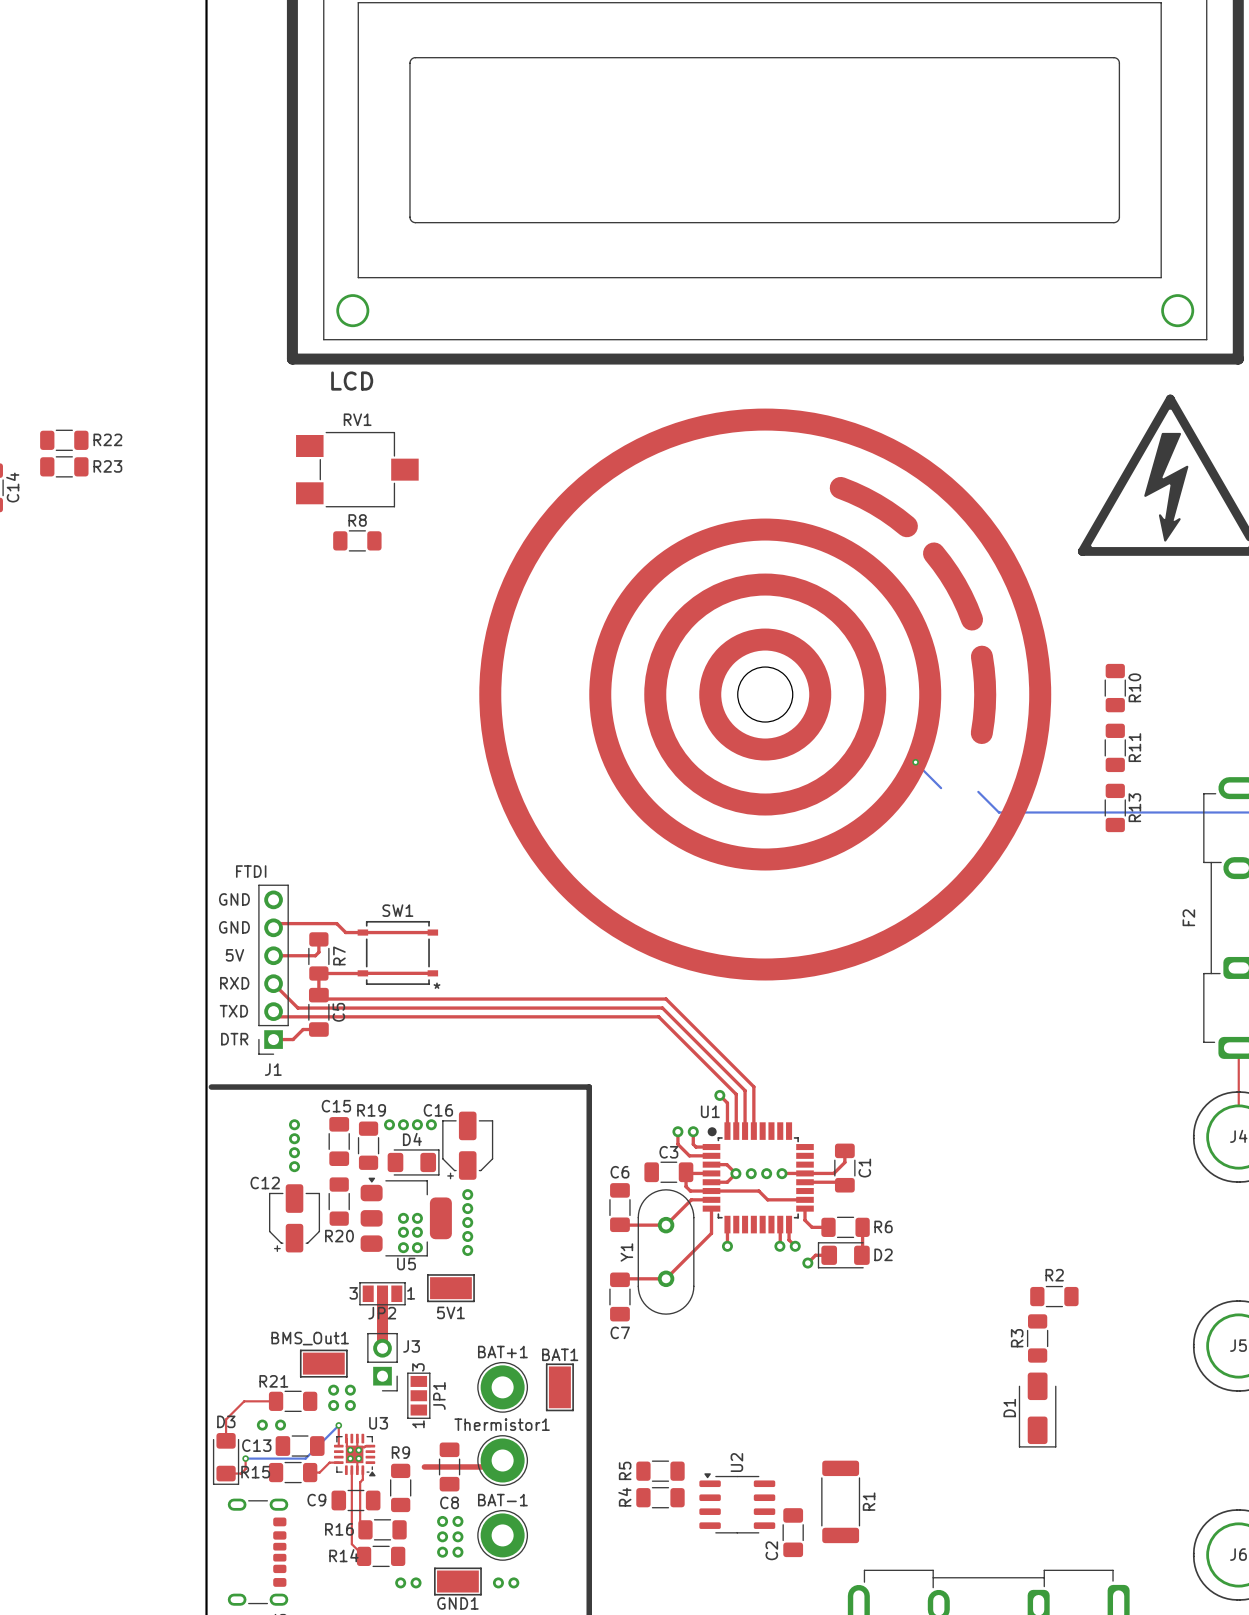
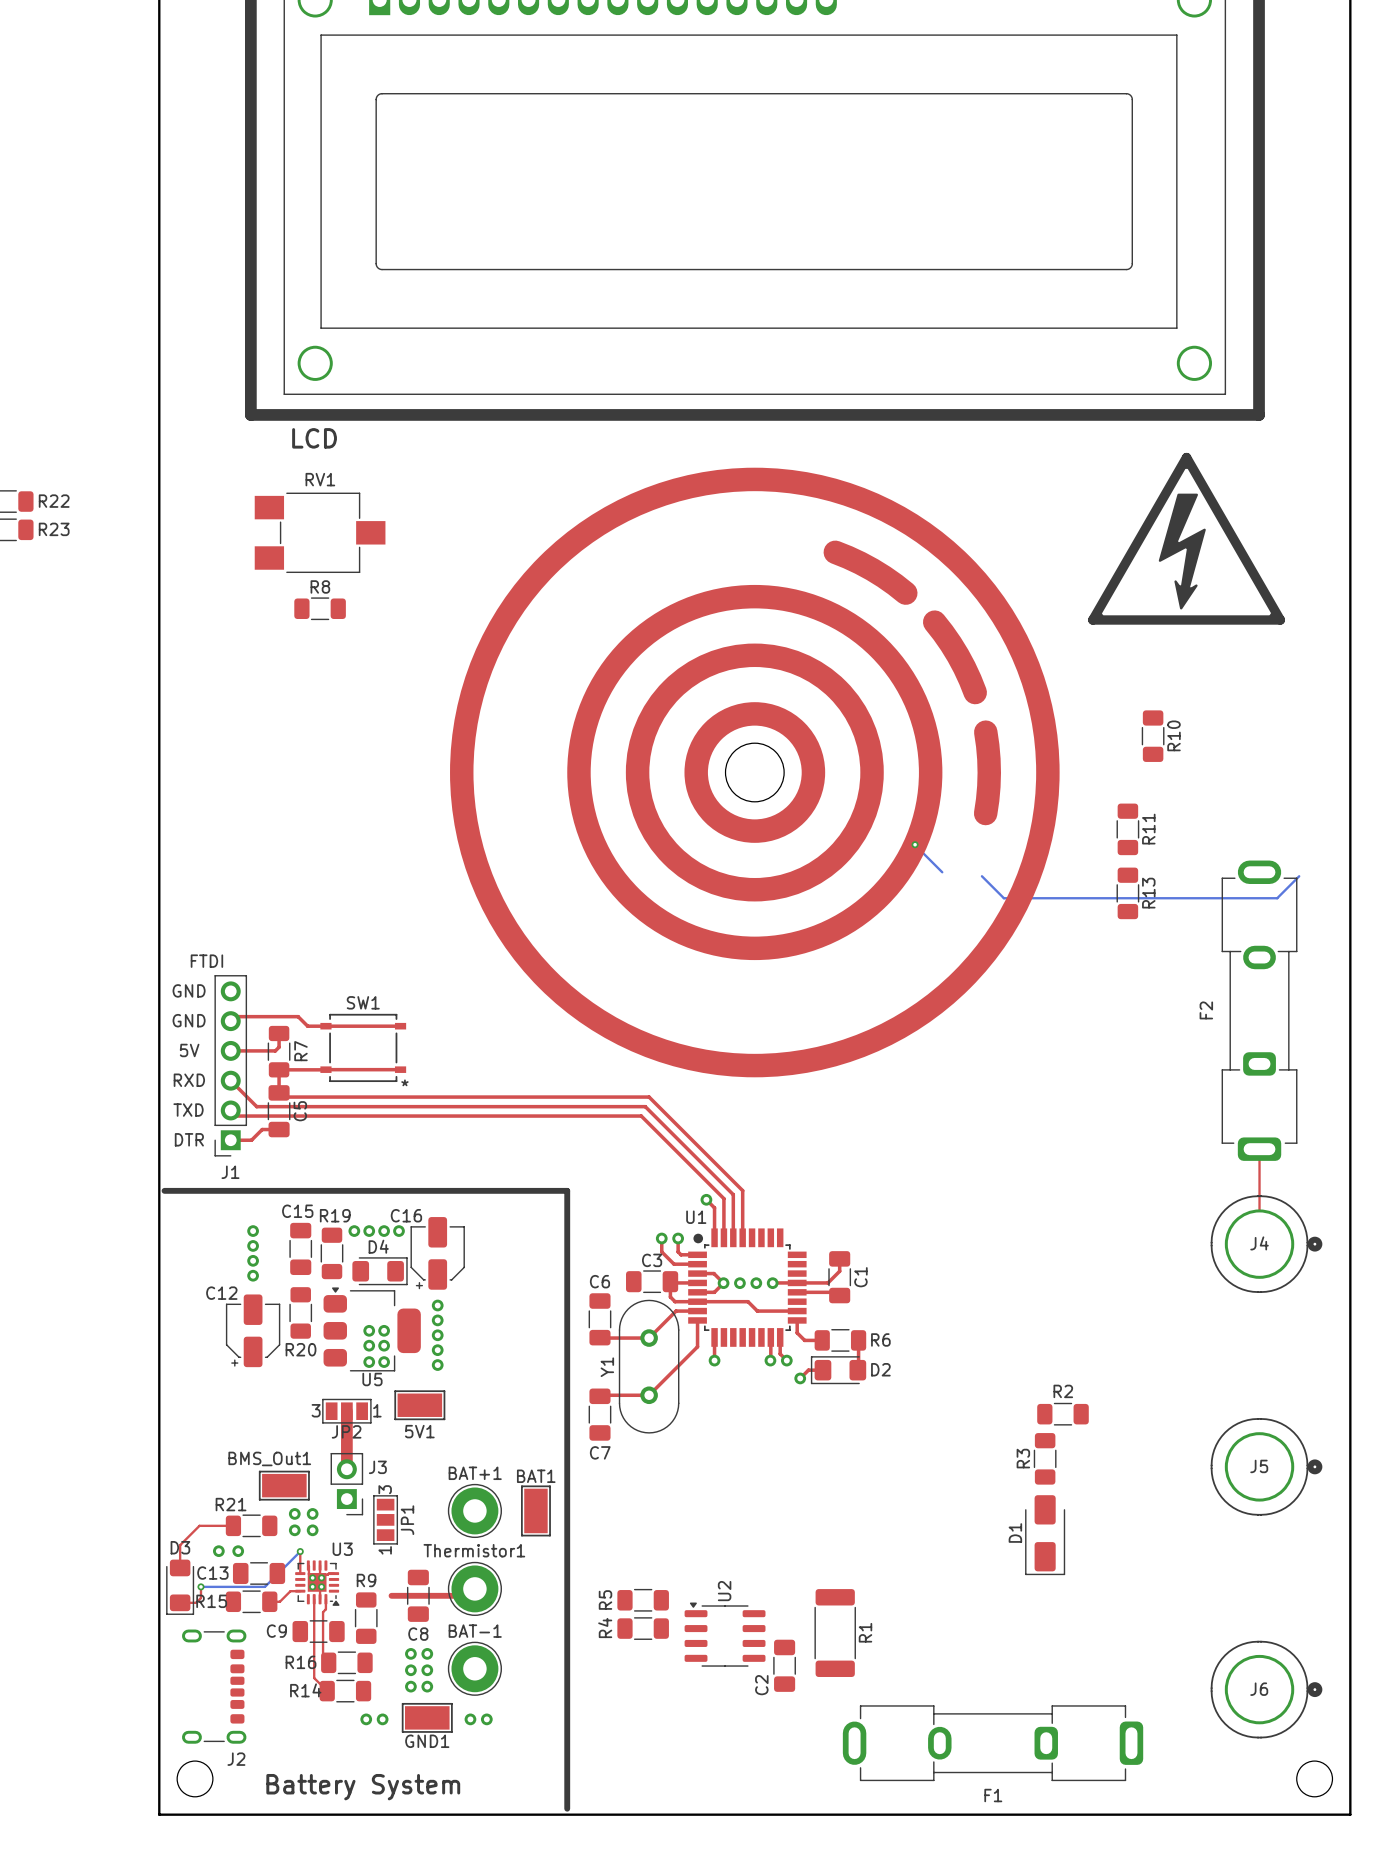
R10 position: (1115, 688) -> (1153, 736)

